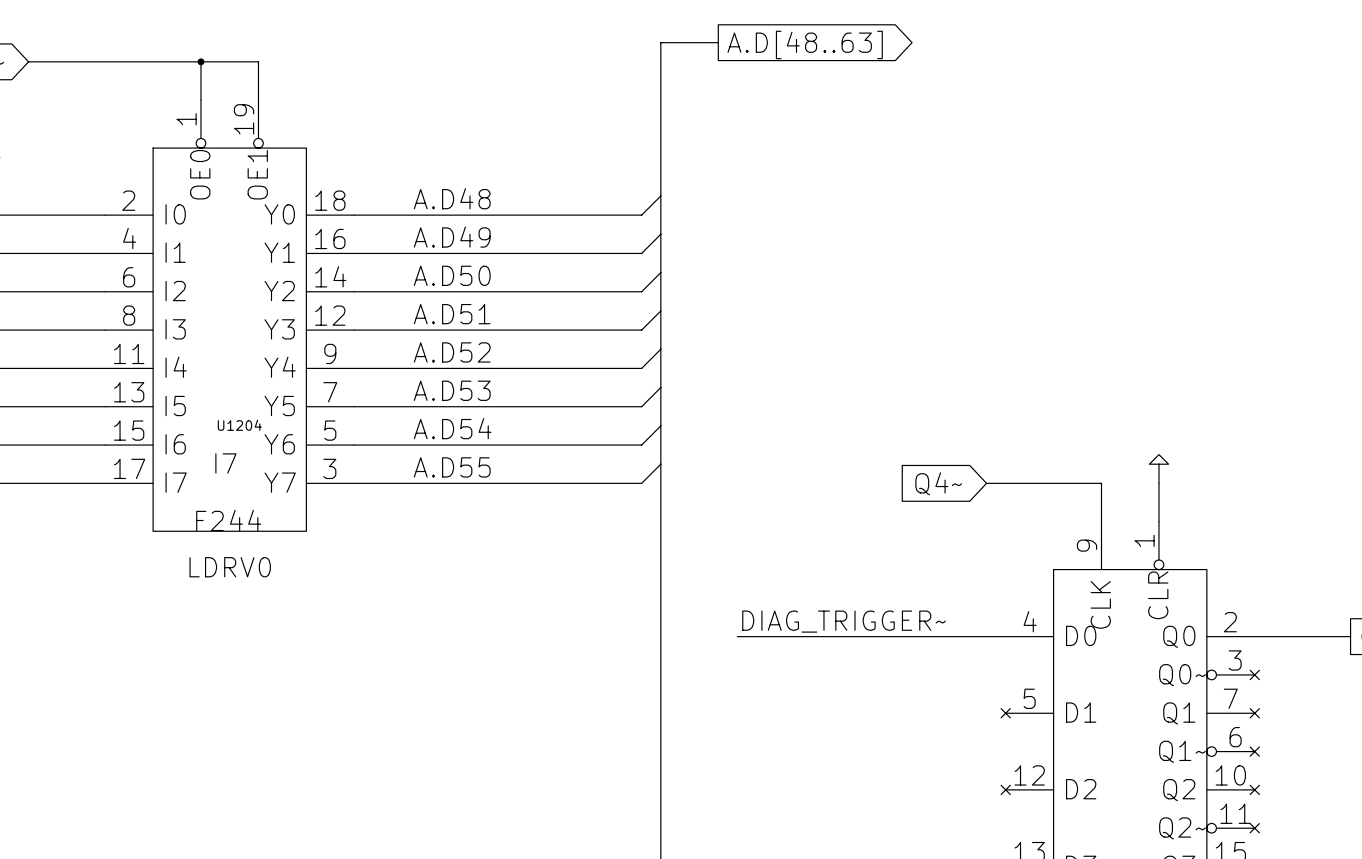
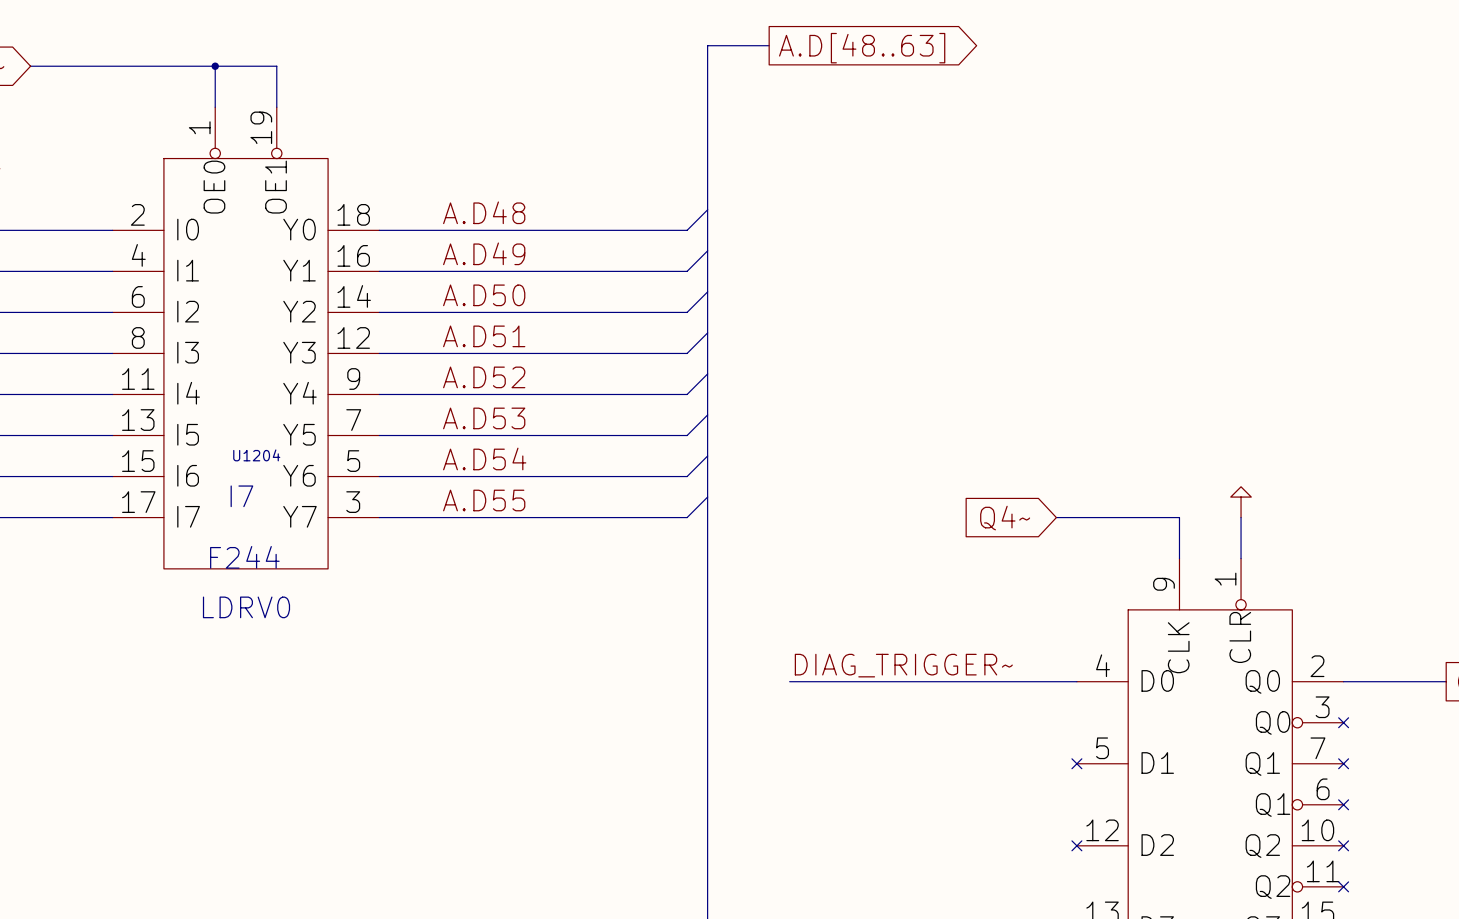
part pin name: Q0~ (1182, 675) -> Q0 (1273, 722)
part pin name: Q1~ (1182, 751) -> Q1 (1273, 805)
part pin name: Q2~ (1182, 828) -> Q2 (1273, 887)

